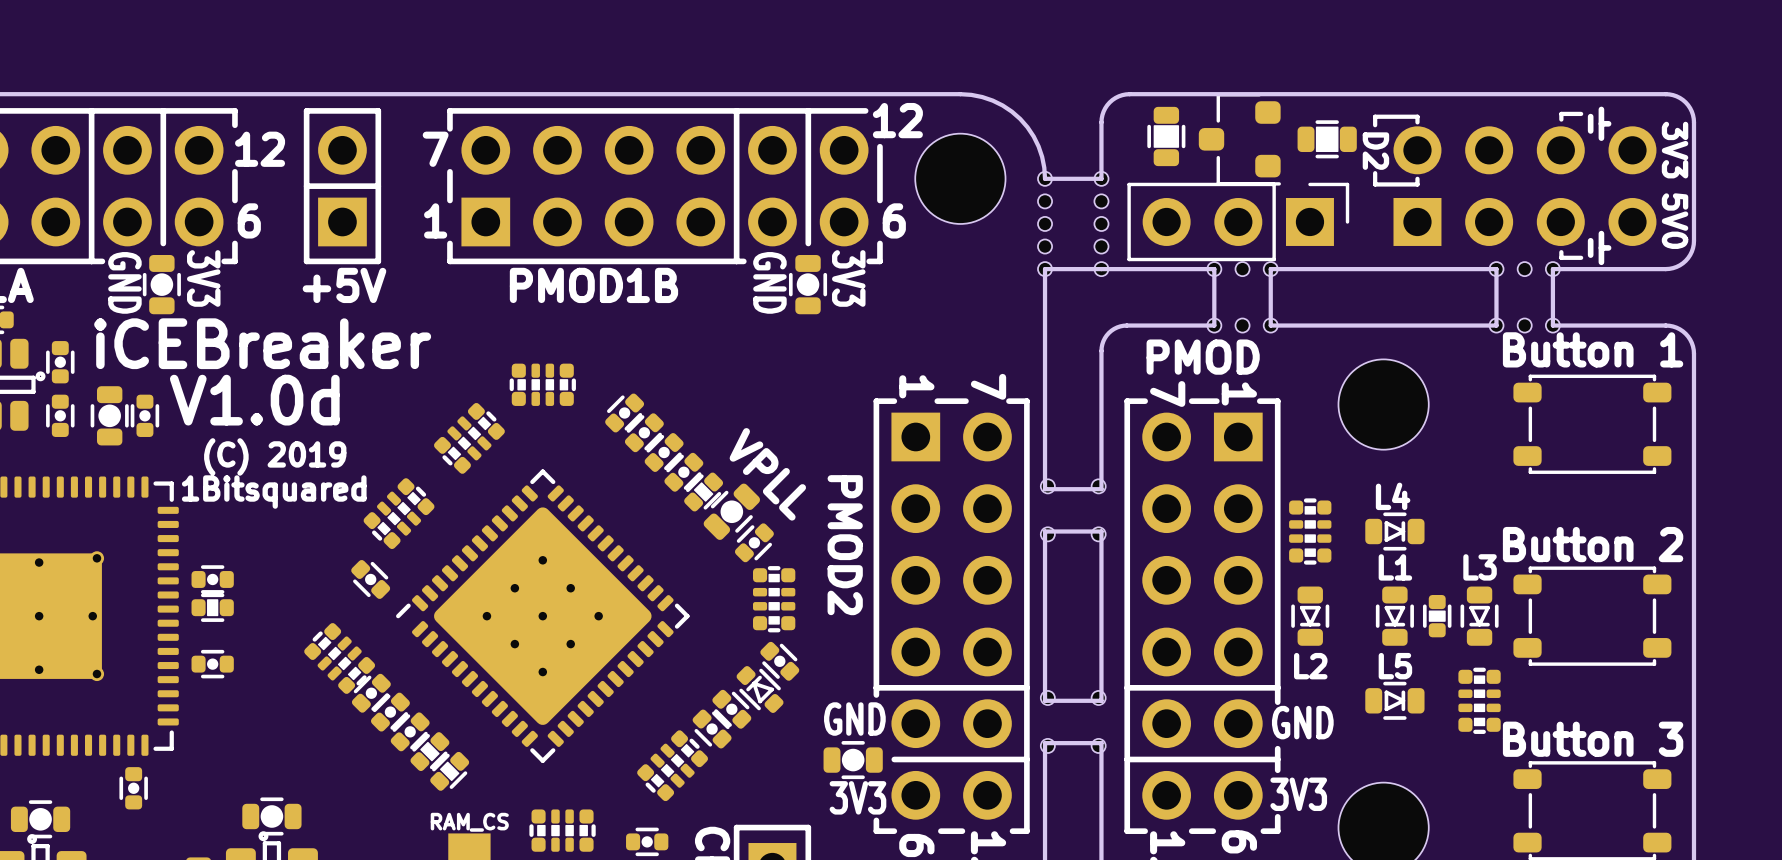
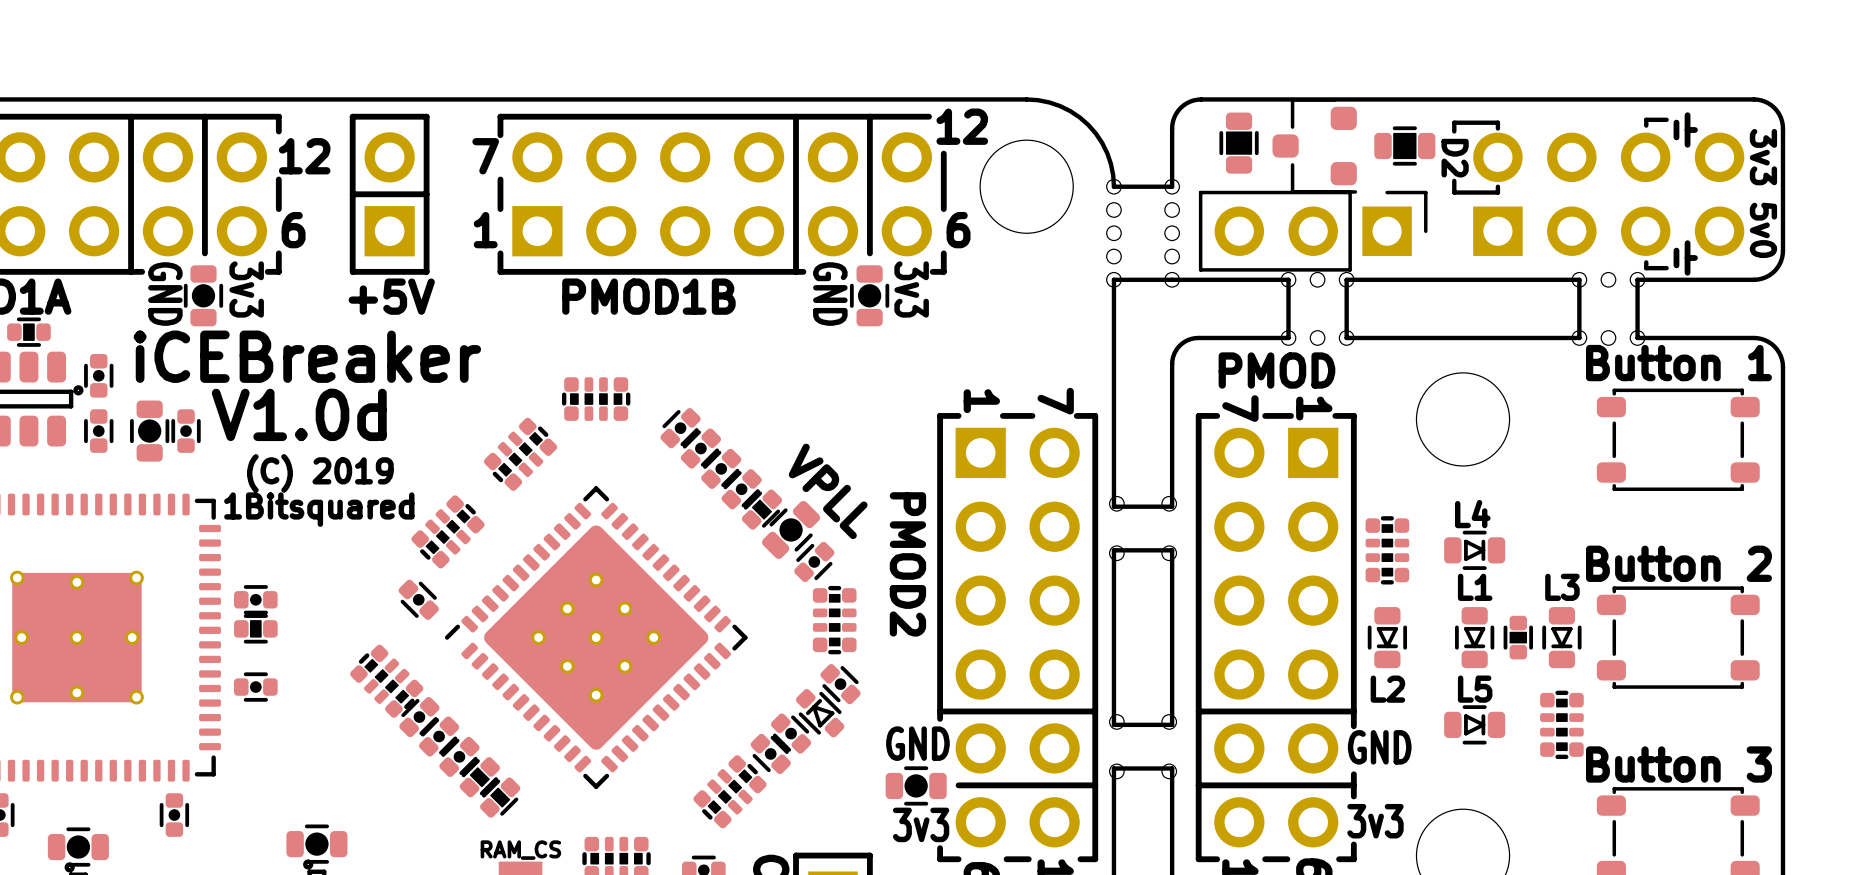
text: 3V3 (1675, 150) -> 3v3 (1763, 157)
text: 5V0 (1675, 221) -> 5v0 (1763, 230)
text: 3V3 (203, 278) -> 3v3 (246, 289)
text: 3V3 (848, 278) -> 3v3 (911, 289)
text: 3V3 (1298, 794) -> 3v3 (1375, 821)
text: 3V3 (857, 797) -> 3v3 (921, 824)

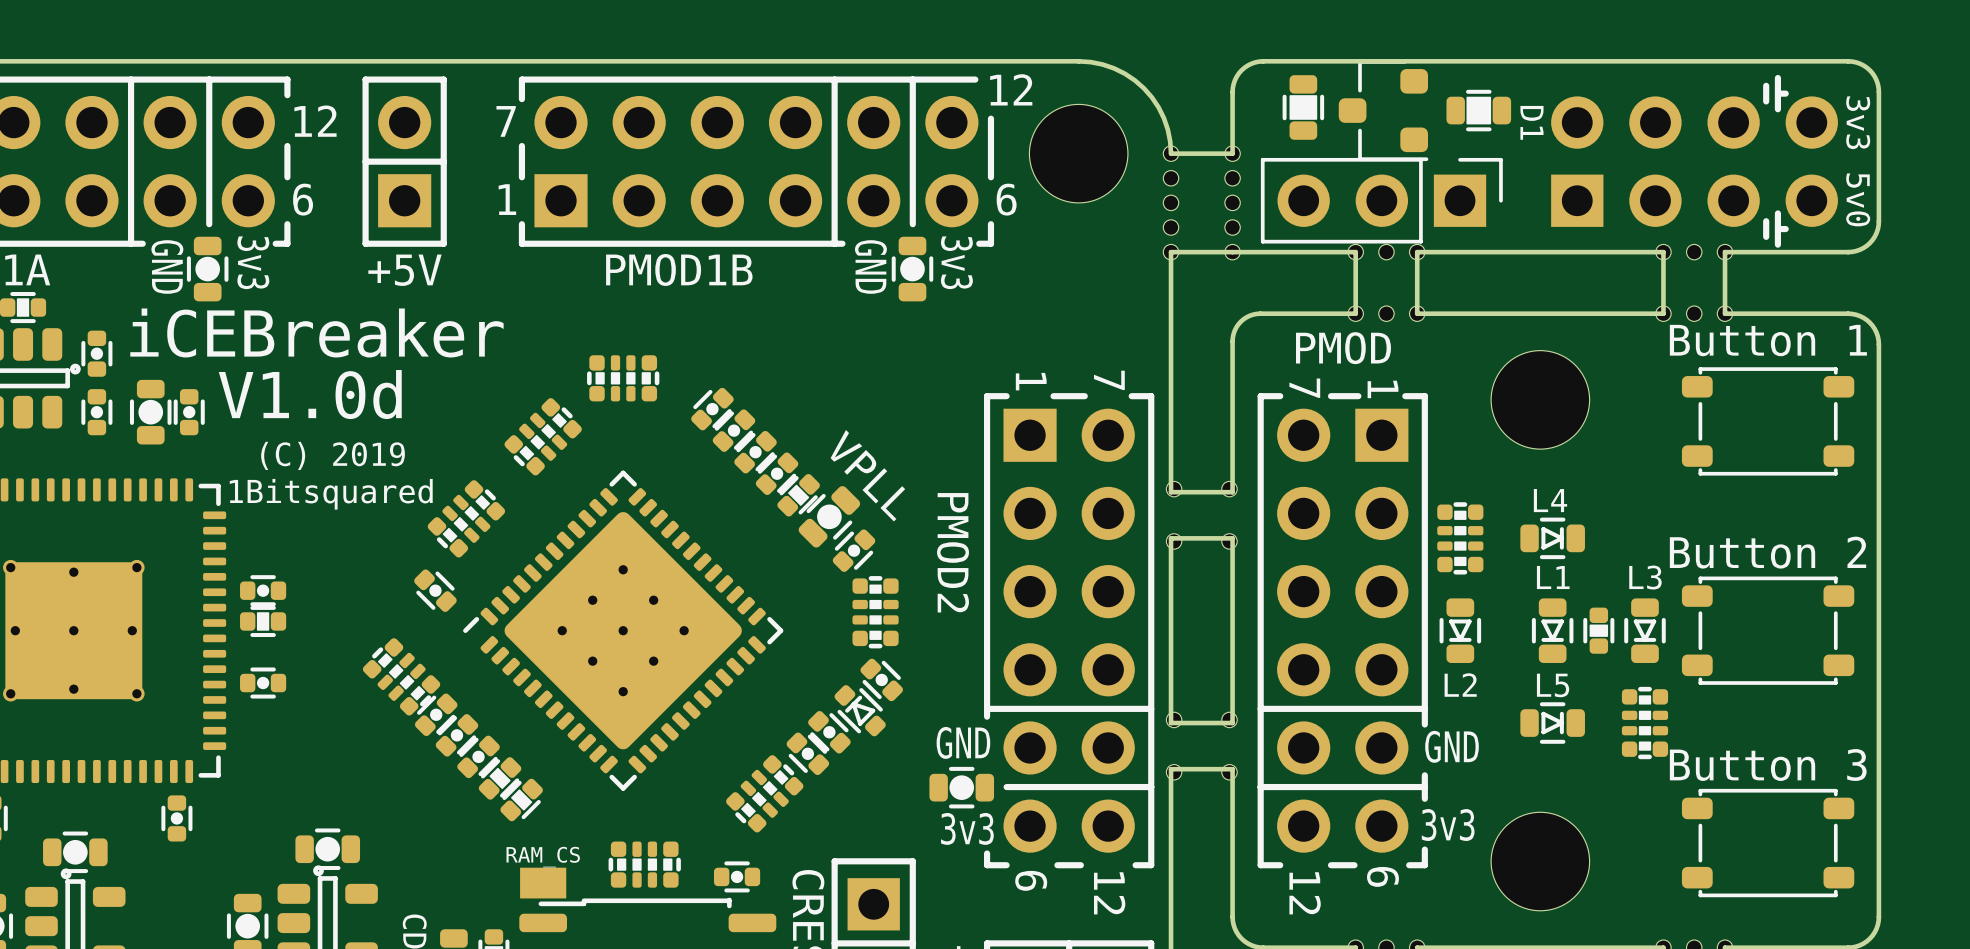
line: (1666, 119) (1646, 119) (1646, 125) -> none
line: (1497, 128) (1497, 122) (1454, 122) (1454, 131) -> none
text: D2 (1455, 158) -> D1 (1531, 122)
line: (1454, 180) (1454, 192) (1497, 192) (1497, 186) -> none
line: (1646, 262) (1646, 268) (1666, 268) -> none

